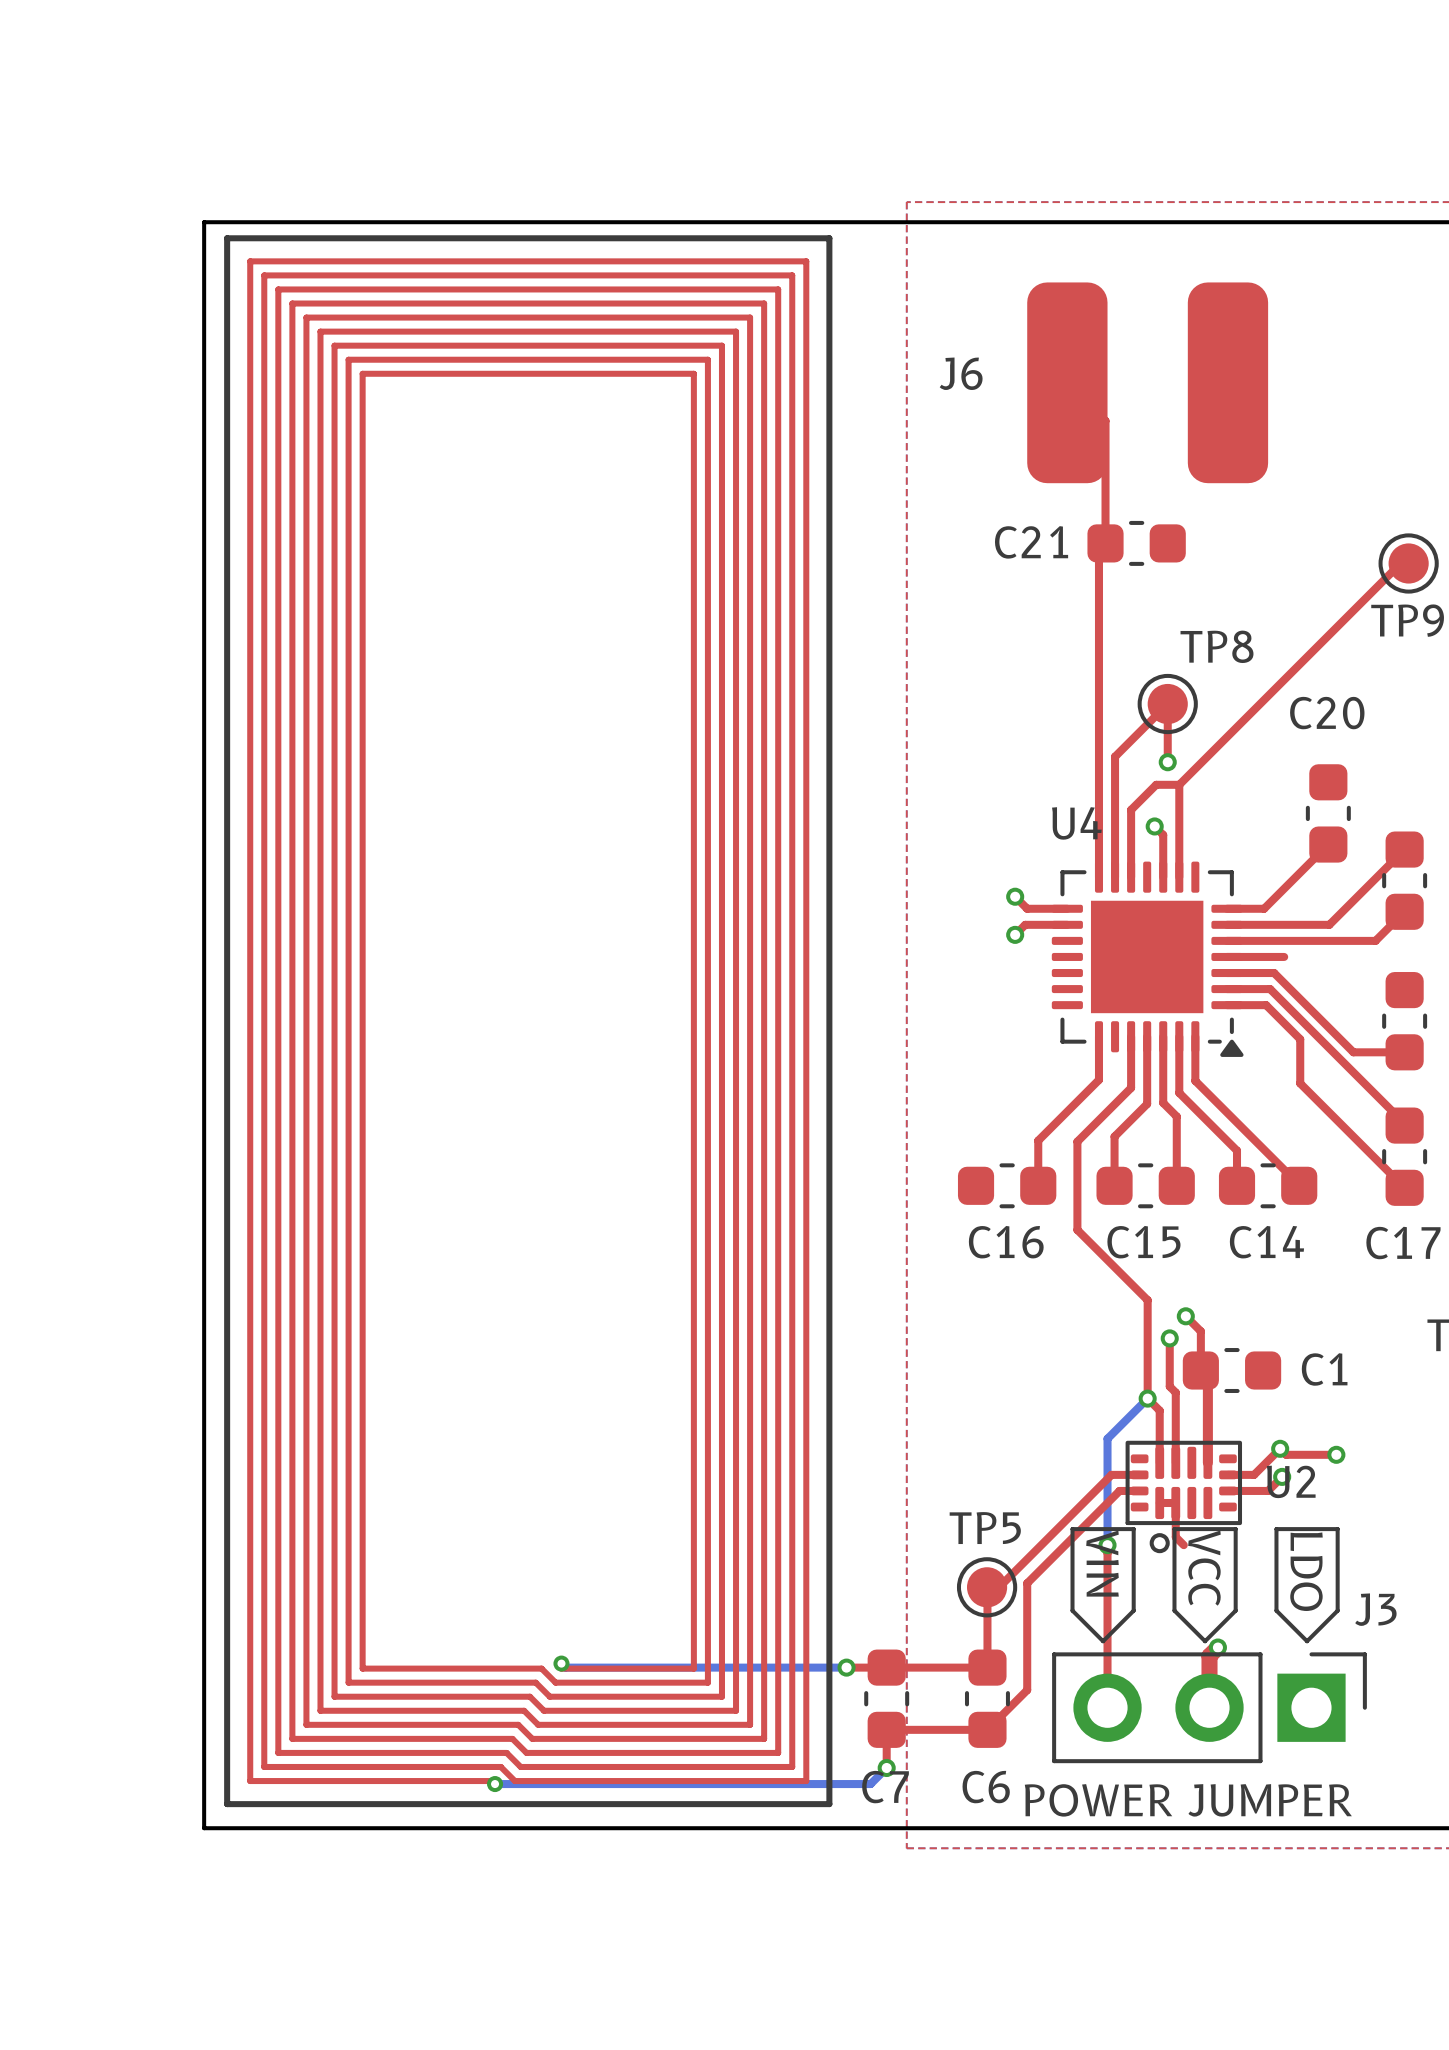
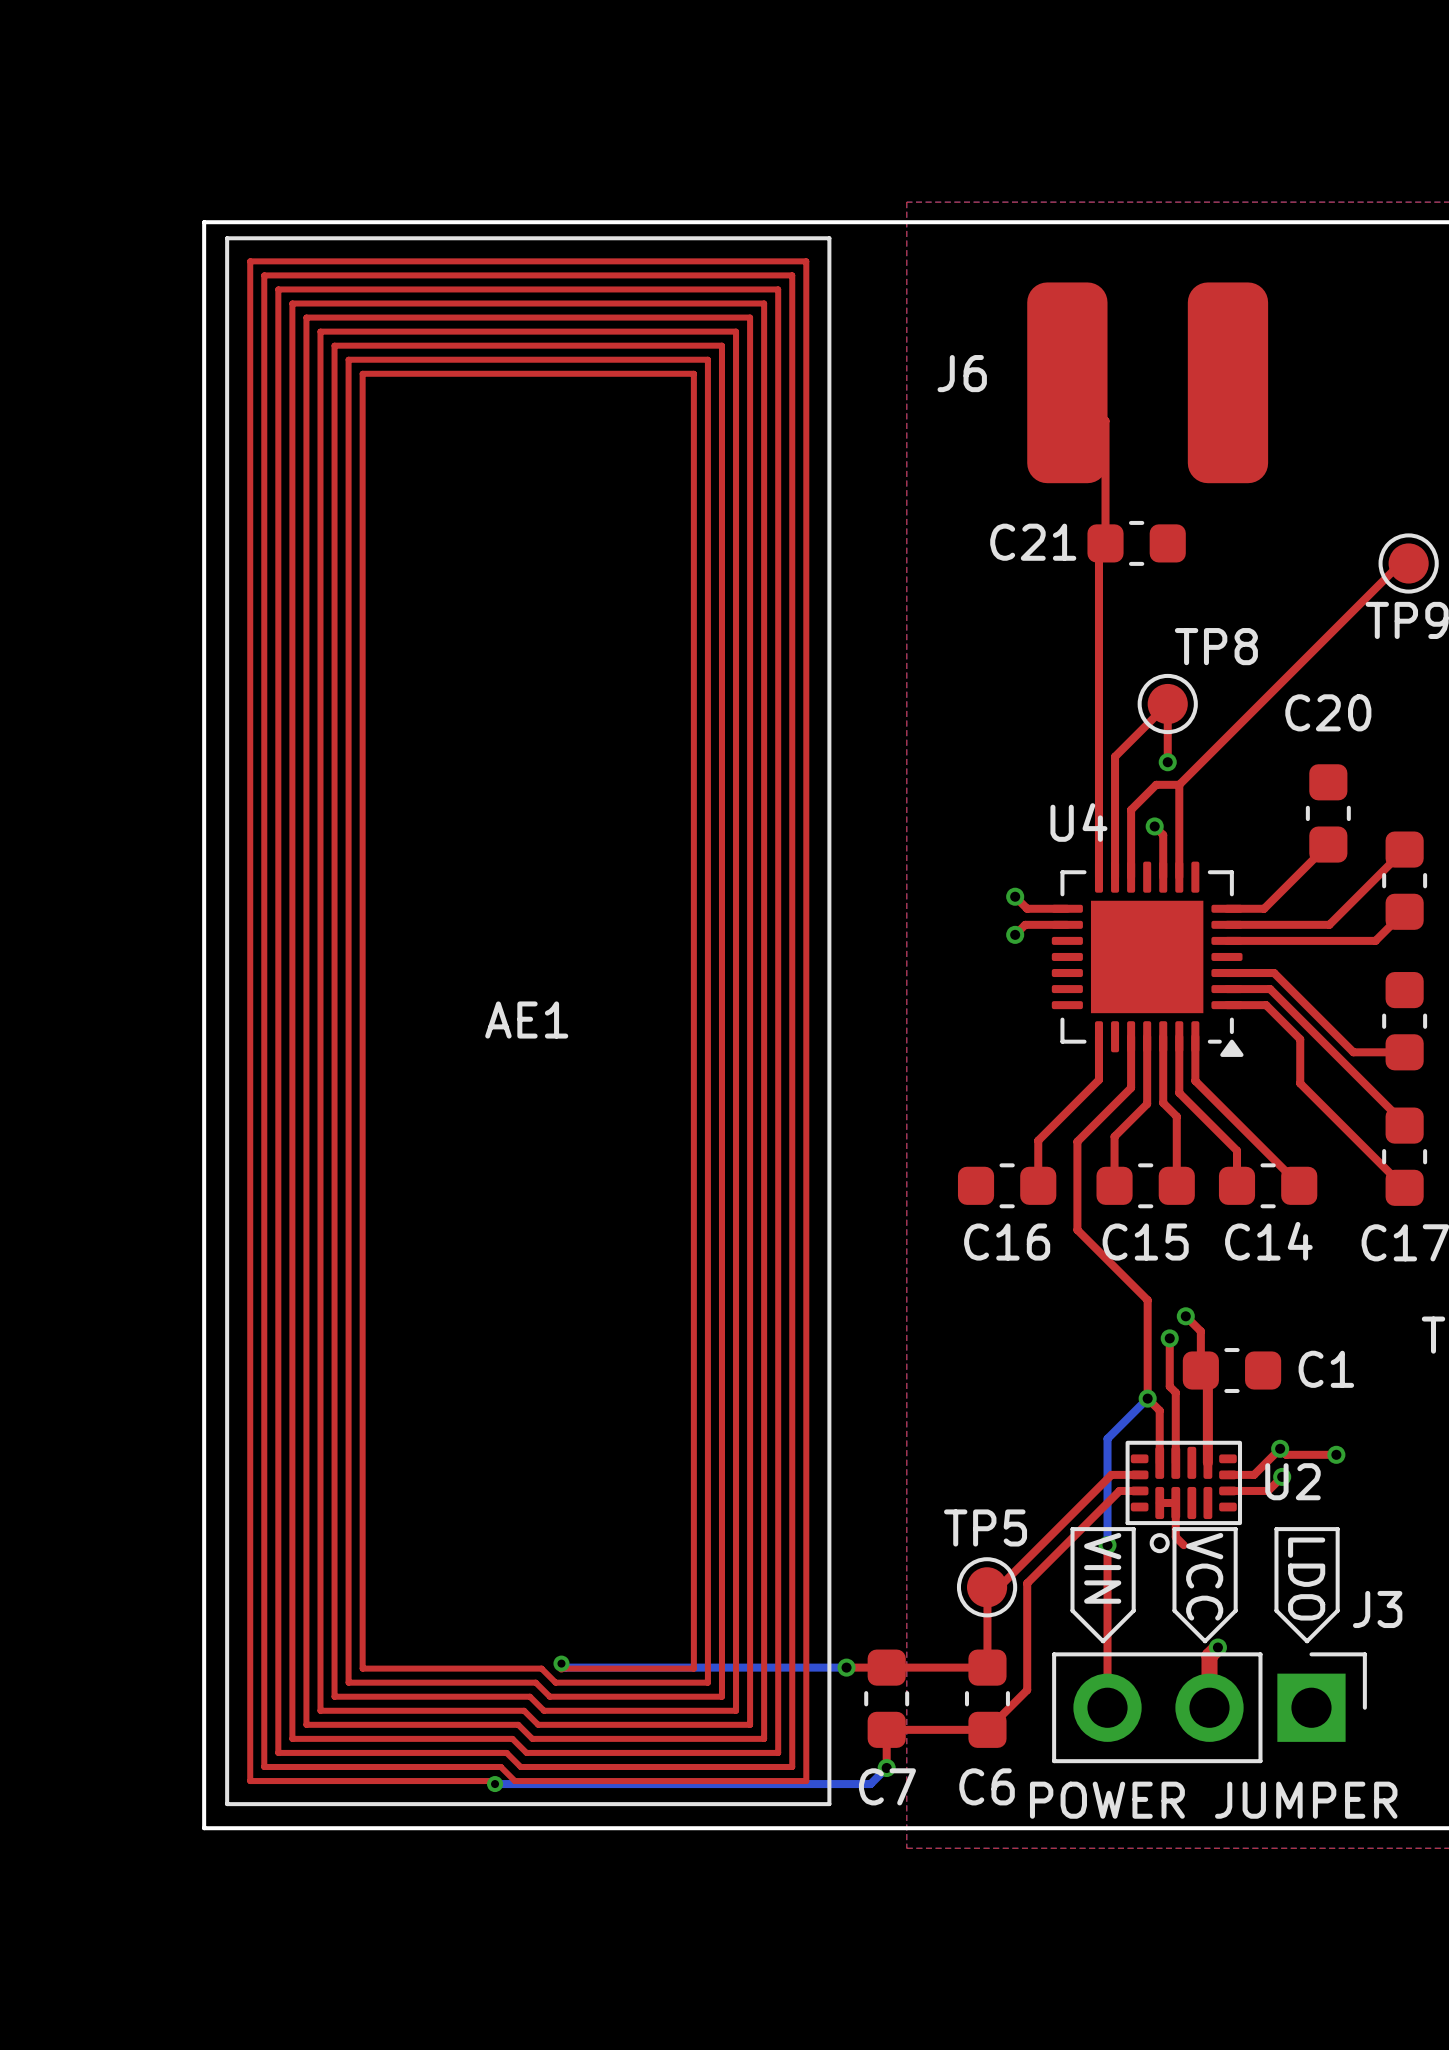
top track: (1226, 956) (1284, 956) -> none
part: (528, 1021) -> none
AE1: none -> (528, 1021)

